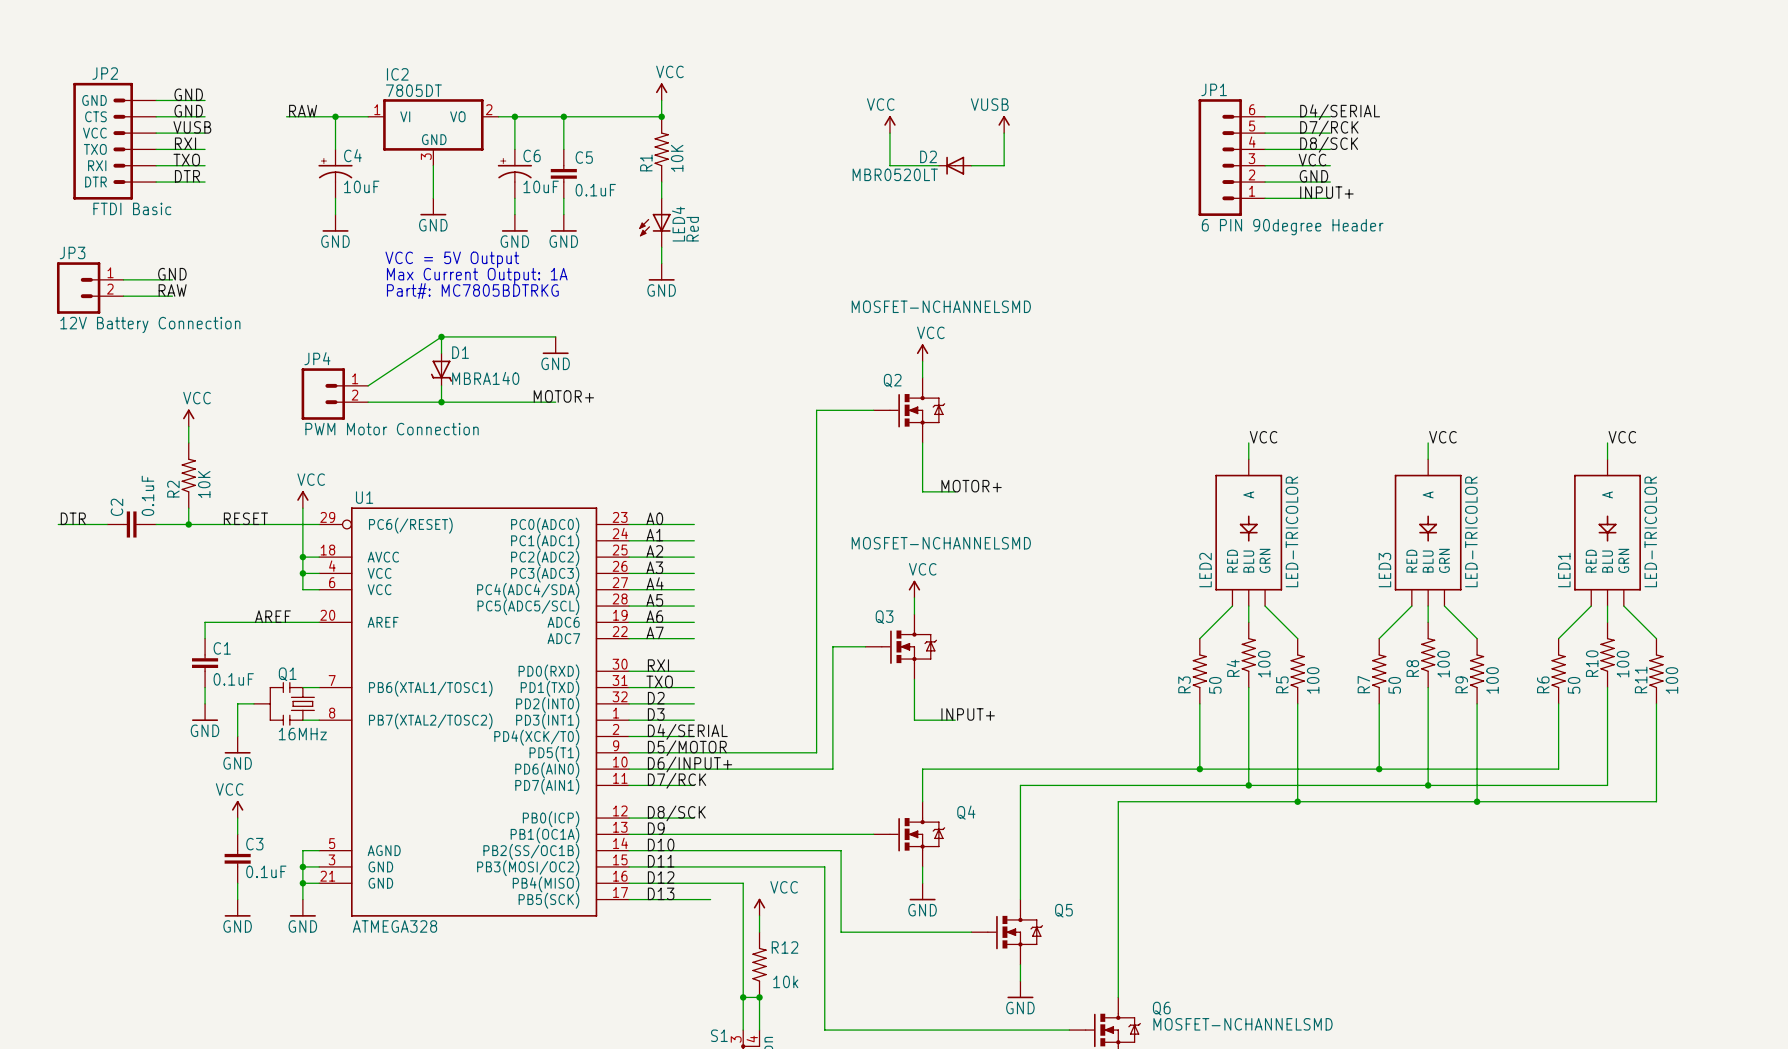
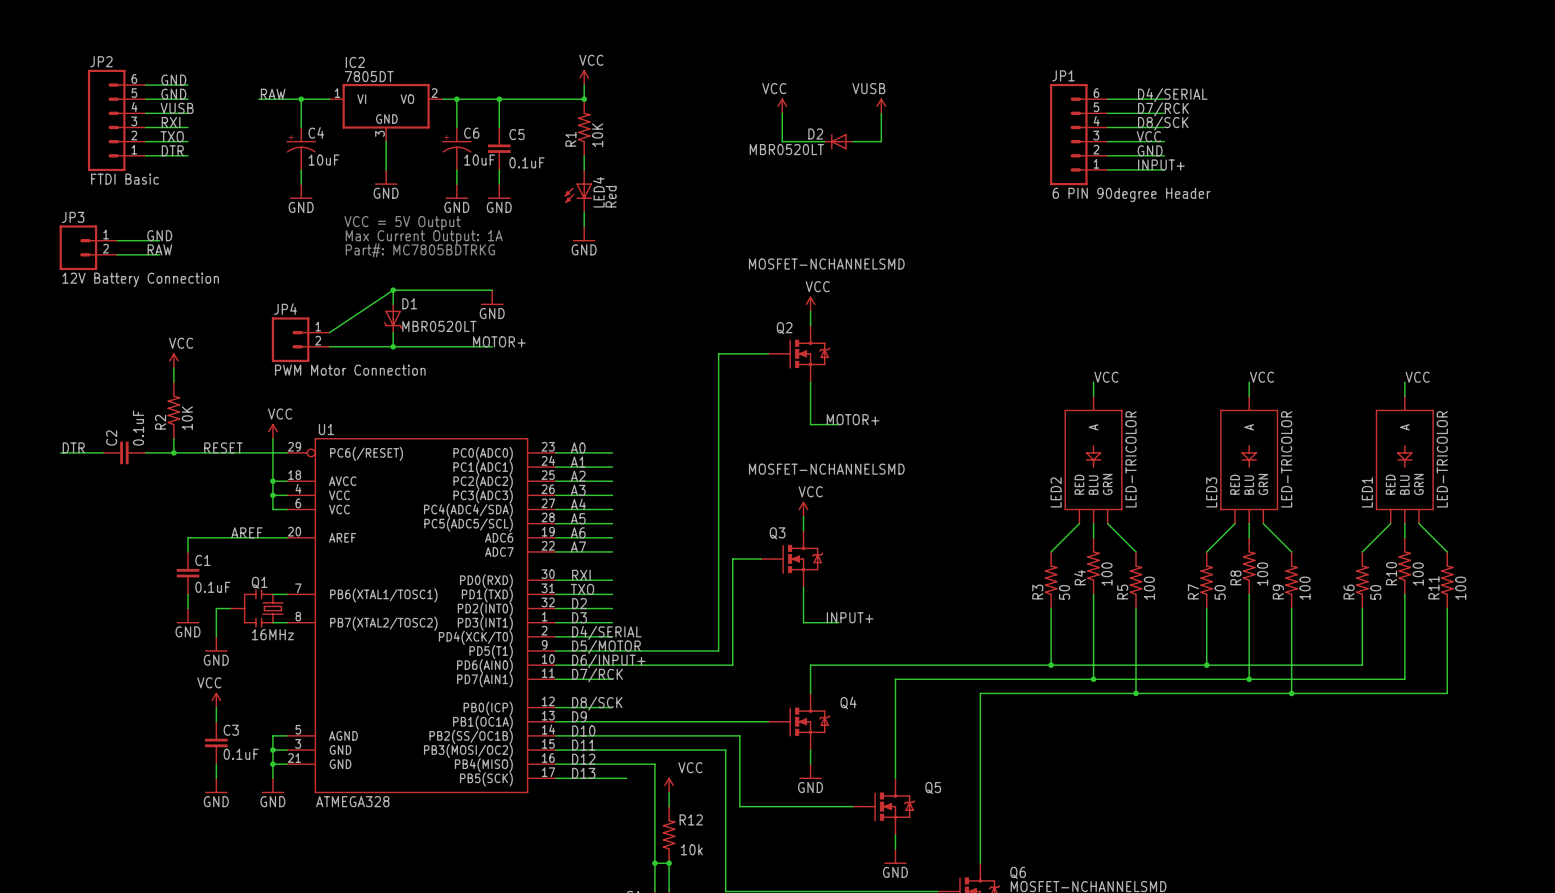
JP2 symbol: [73, 82, 157, 200] -> [87, 69, 146, 172]
D1 value: MBRA140 (485, 378) -> MBR0520LT (439, 326)

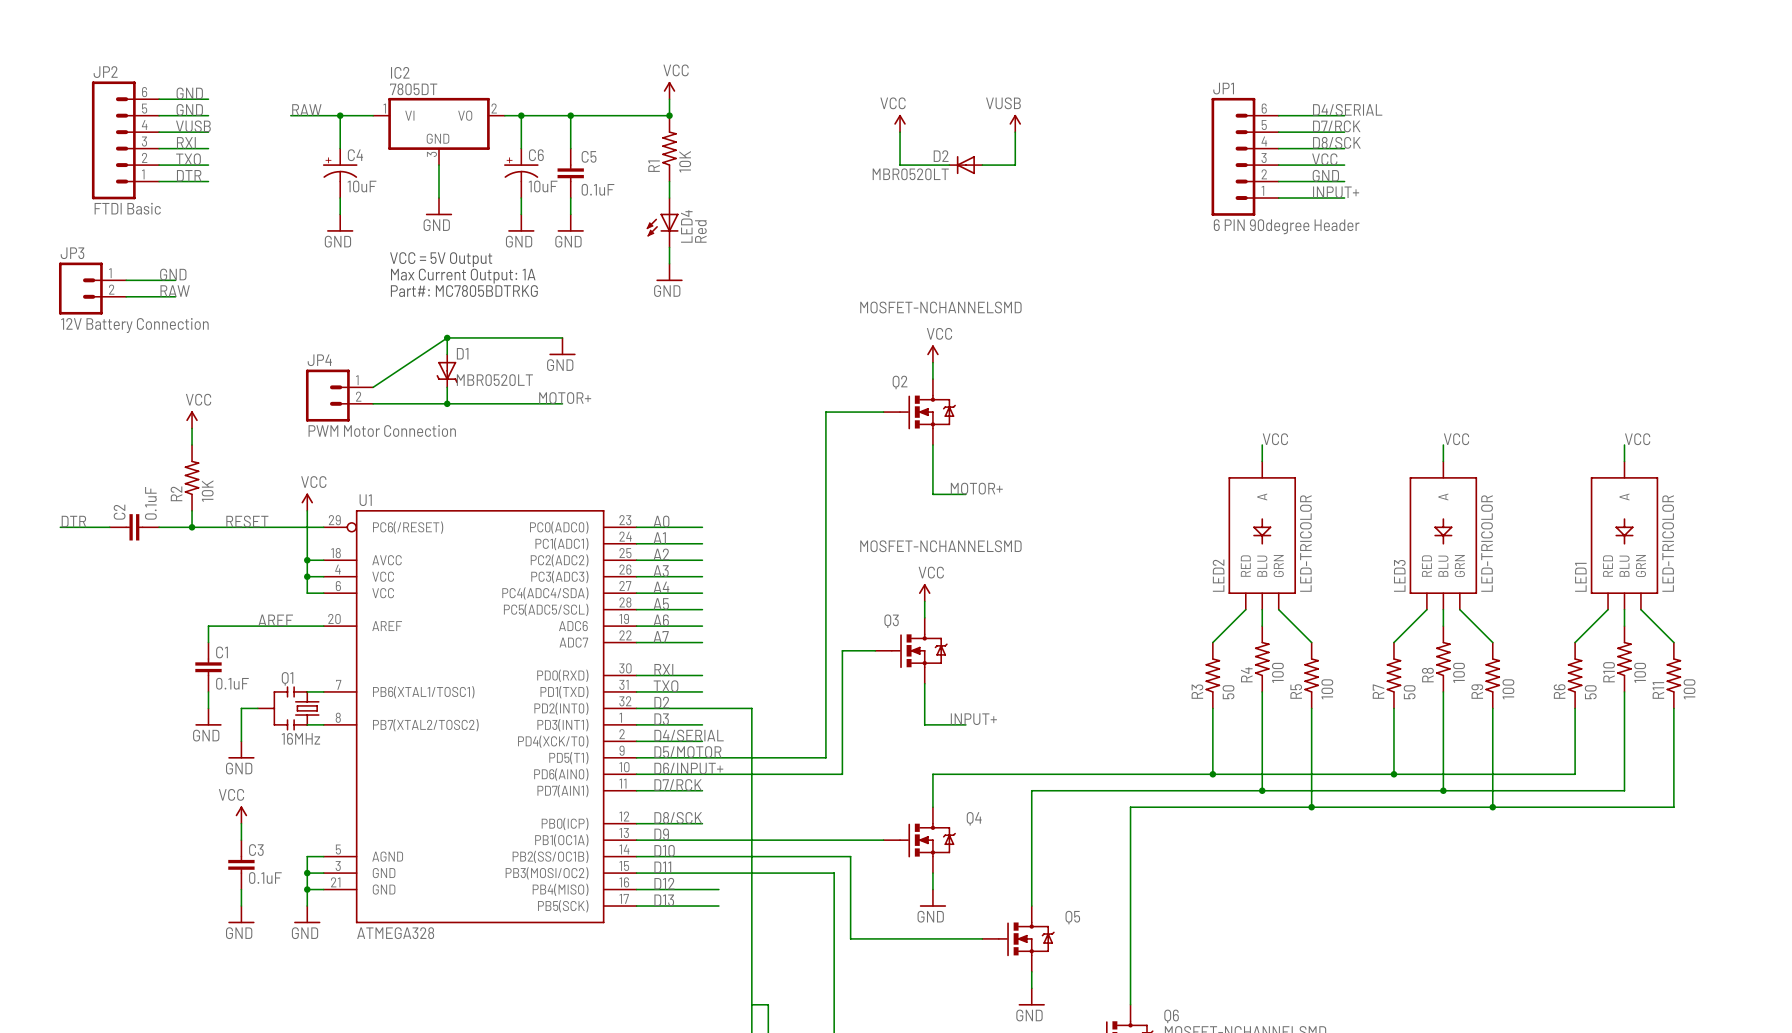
wire: (626, 764) (654, 764) -> (702, 708) (751, 708) (751, 889)
power symbol: VCC (669, 785) -> none
wire: (669, 792) (669, 806) -> none
R12: 10k (669, 834) -> none
junction: (654, 863) -> none
junction: (669, 863) -> none

